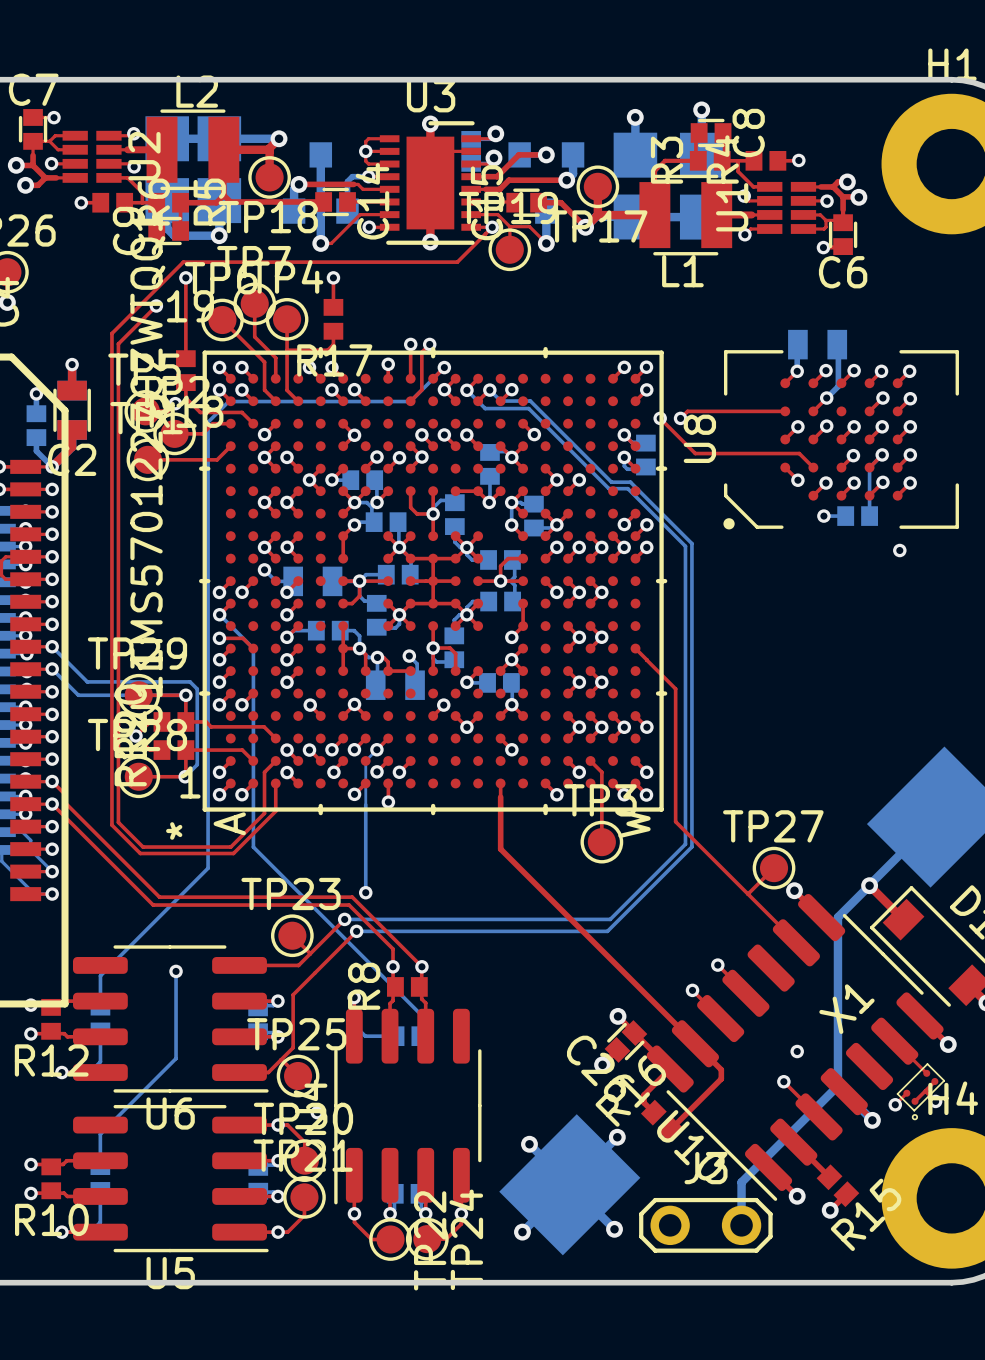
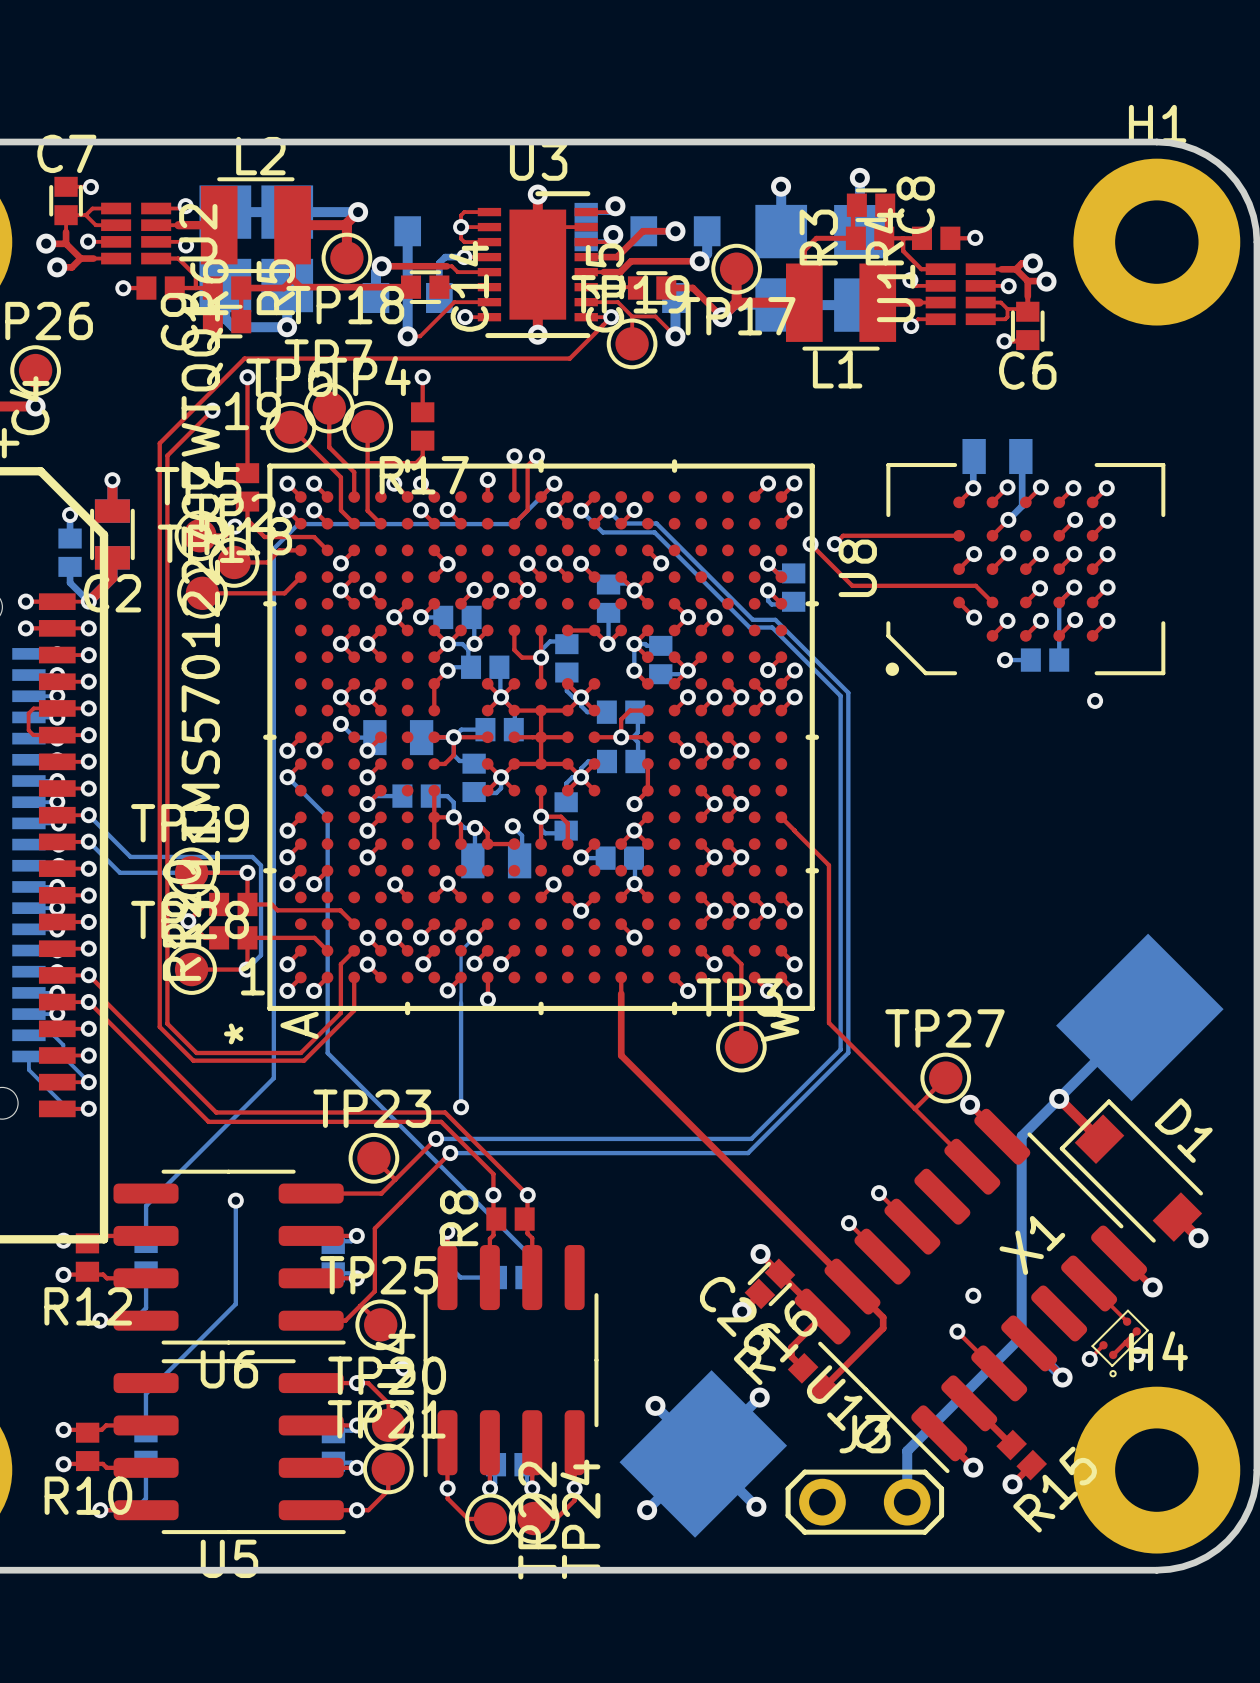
top track: (219, 638) (243, 638) (253, 648) -> none
via: (219, 638) -> none

